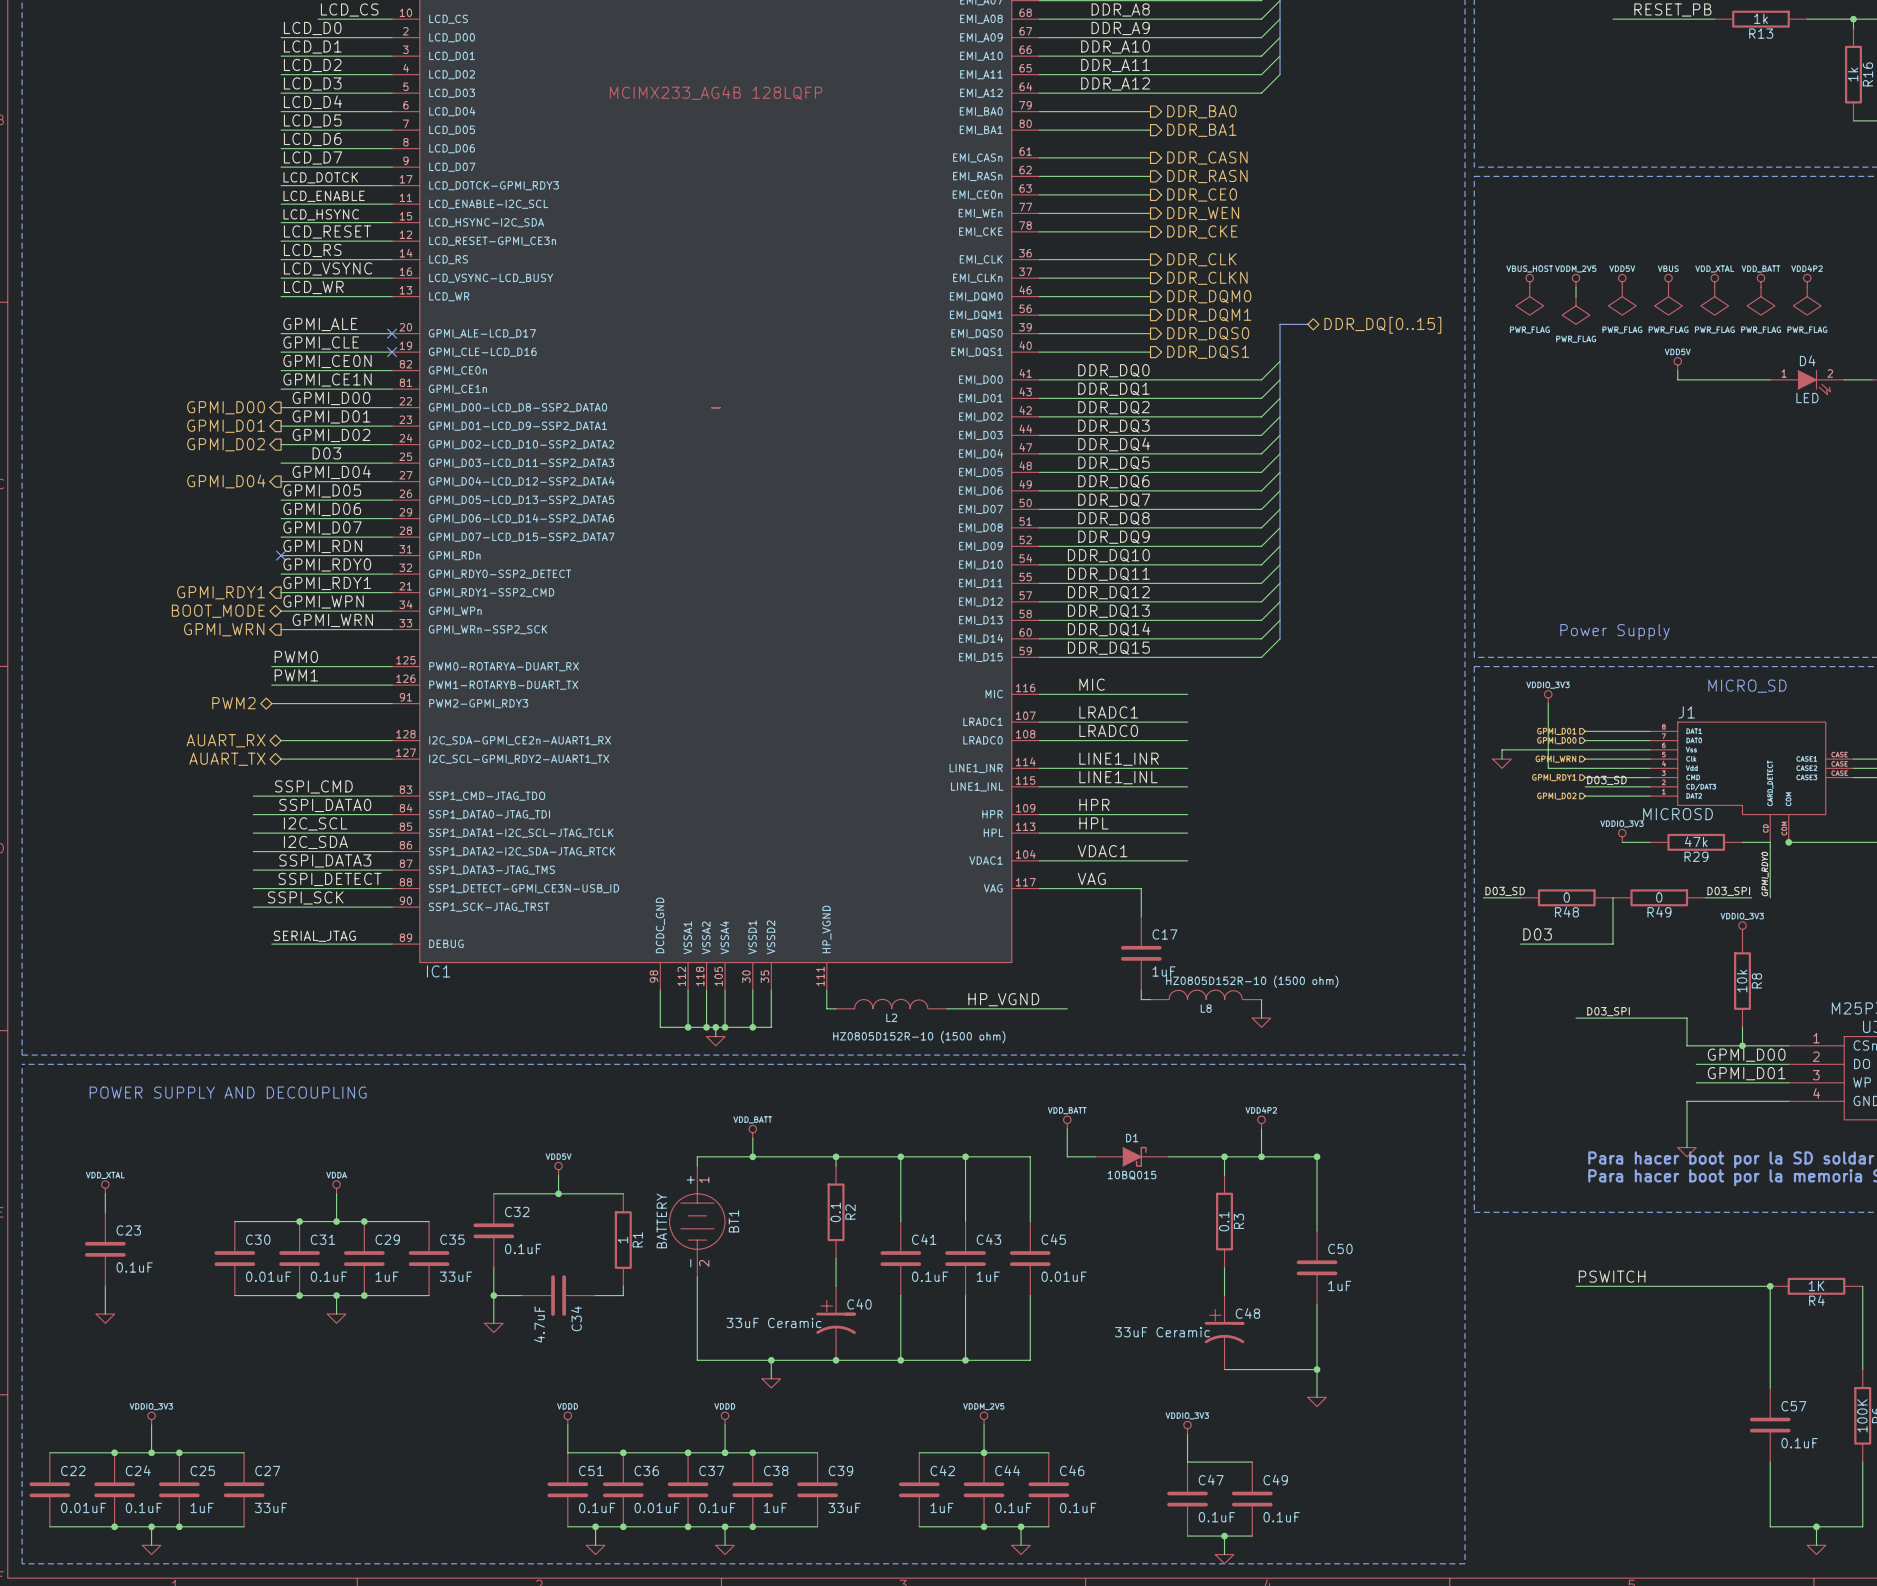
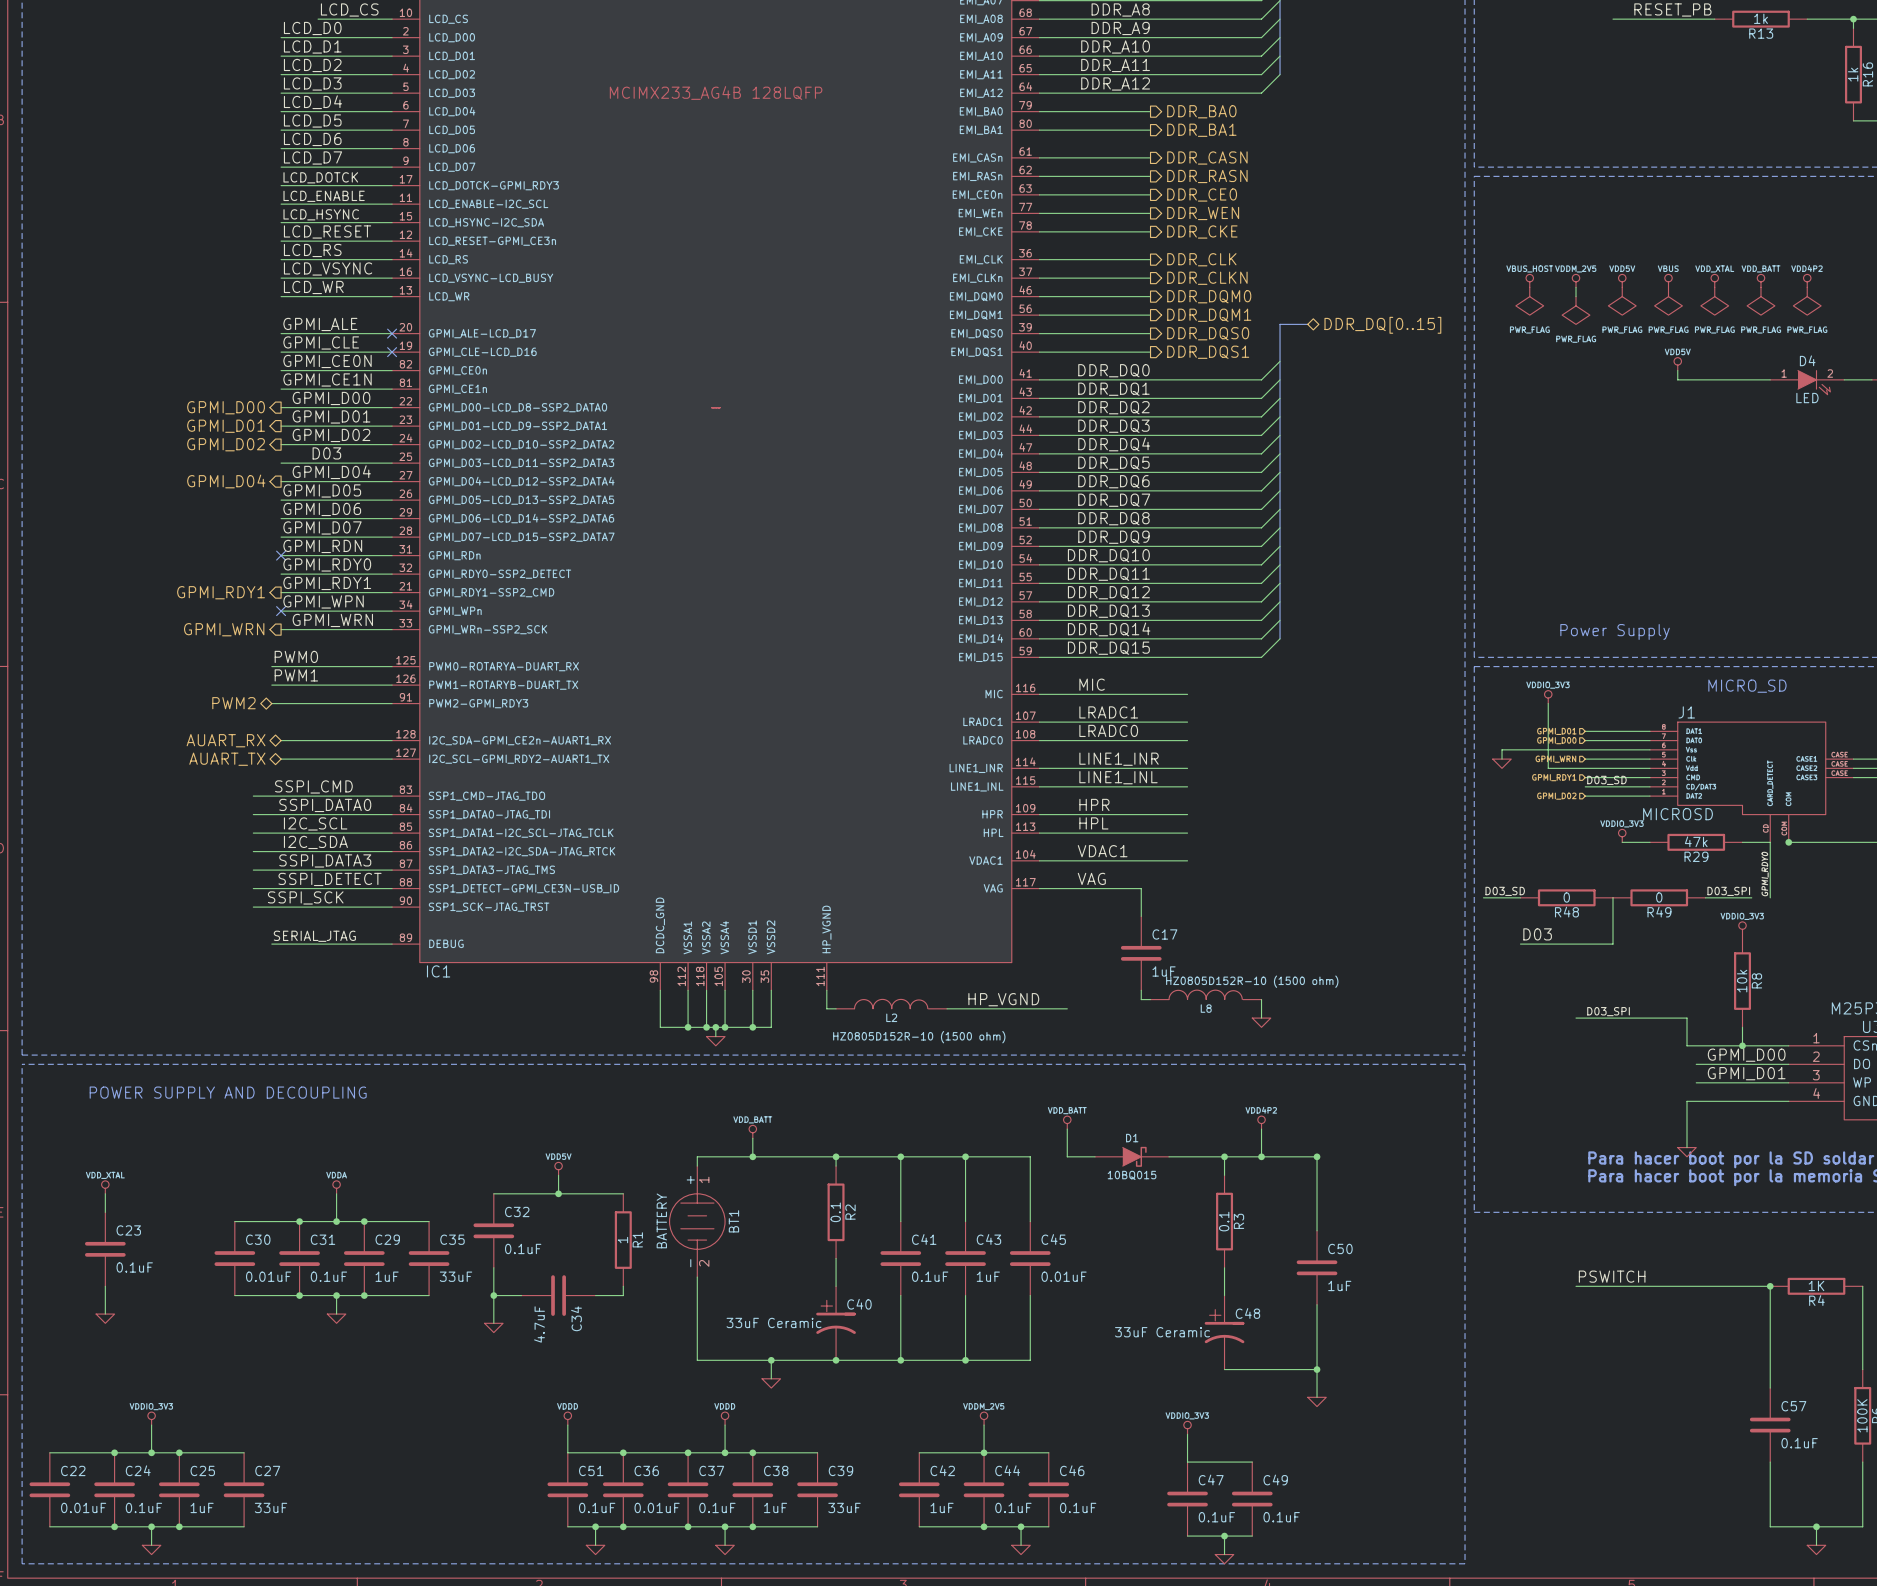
hierarchical label: BOOT_MODE (218, 611) -> none
no-connect mark: none -> (281, 611)

